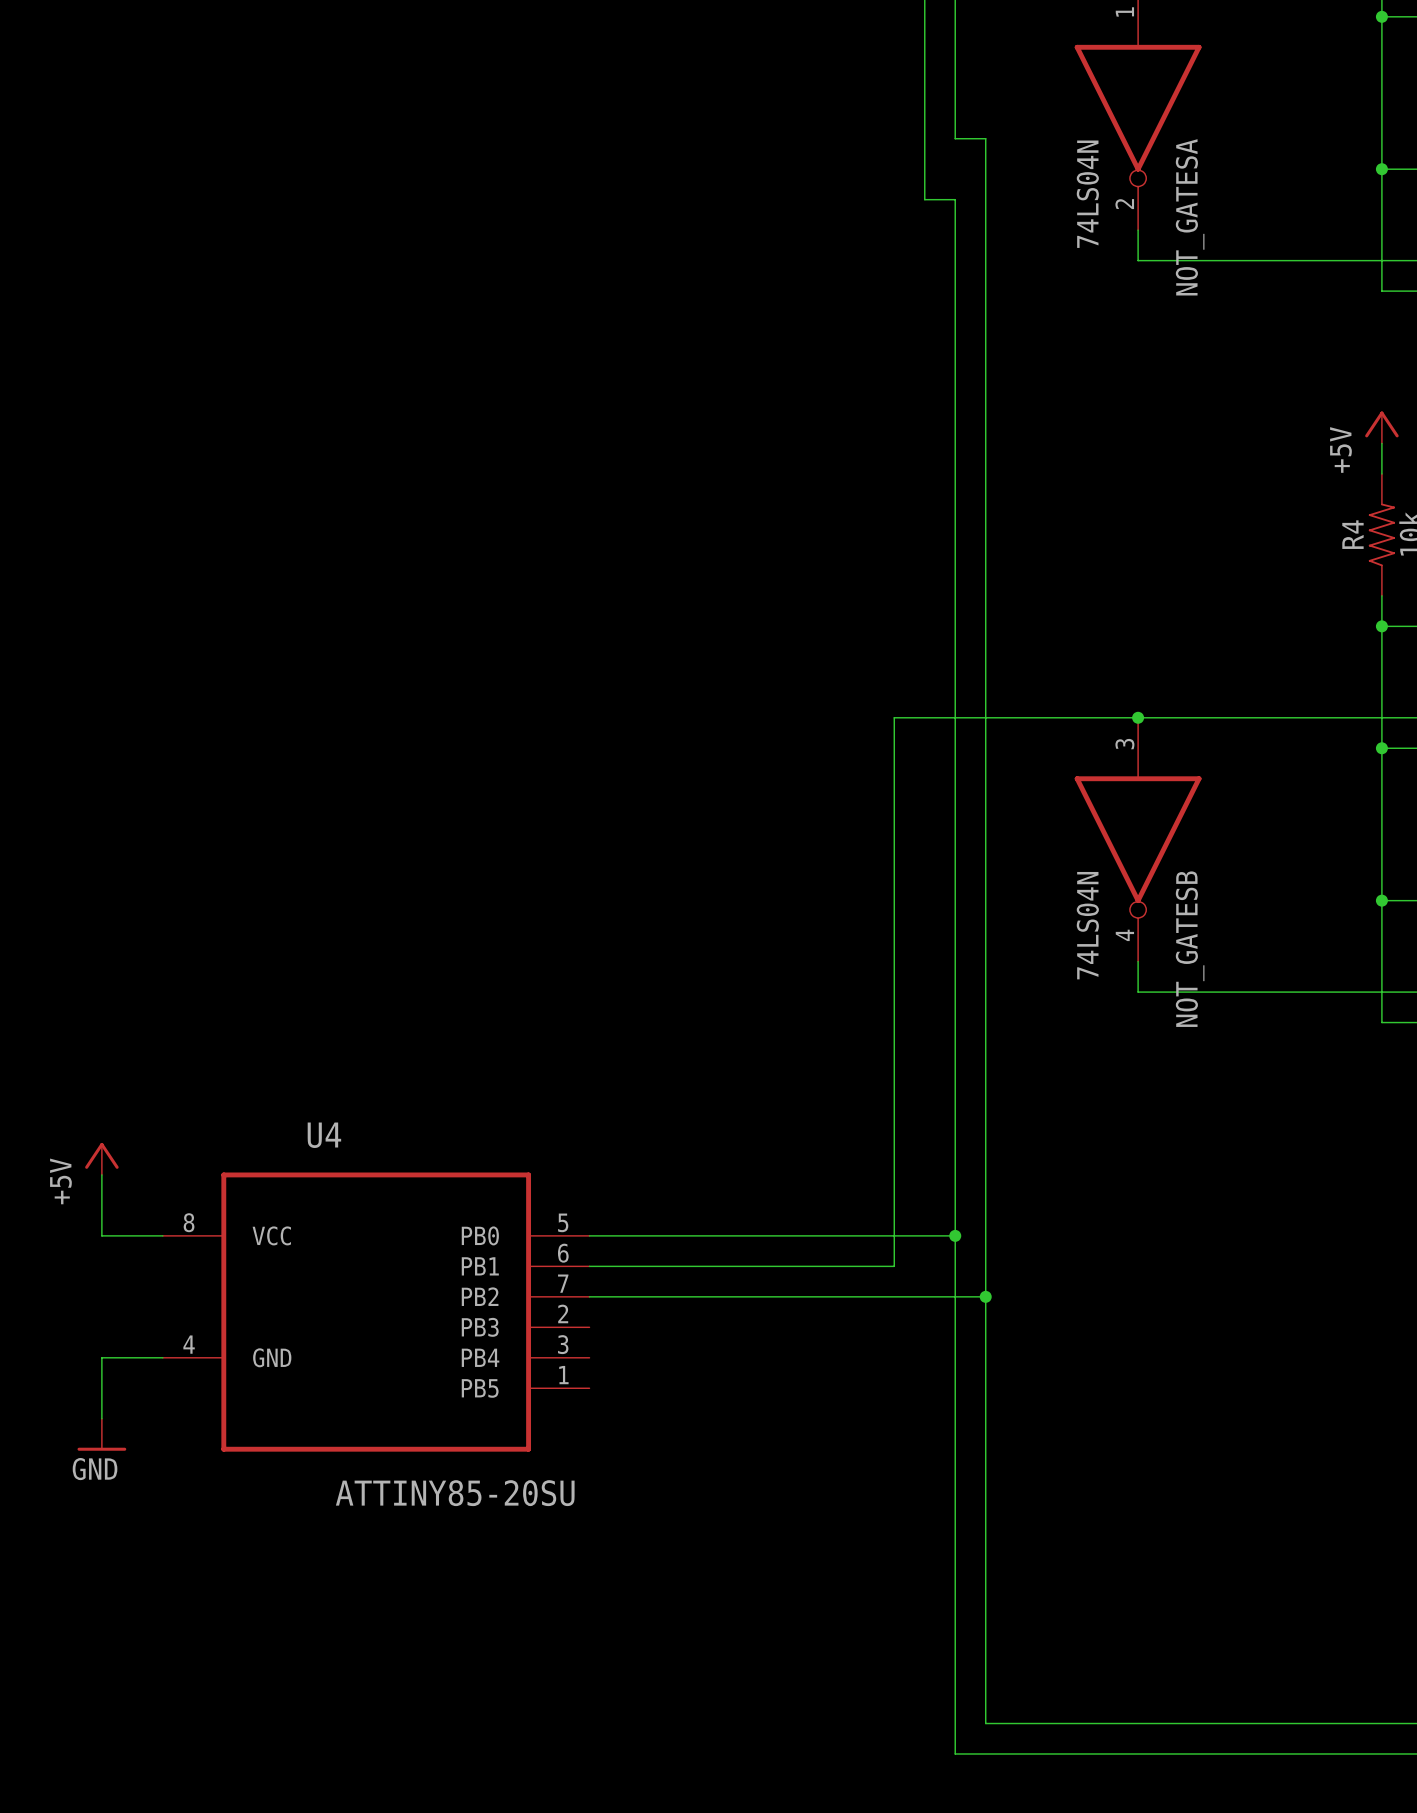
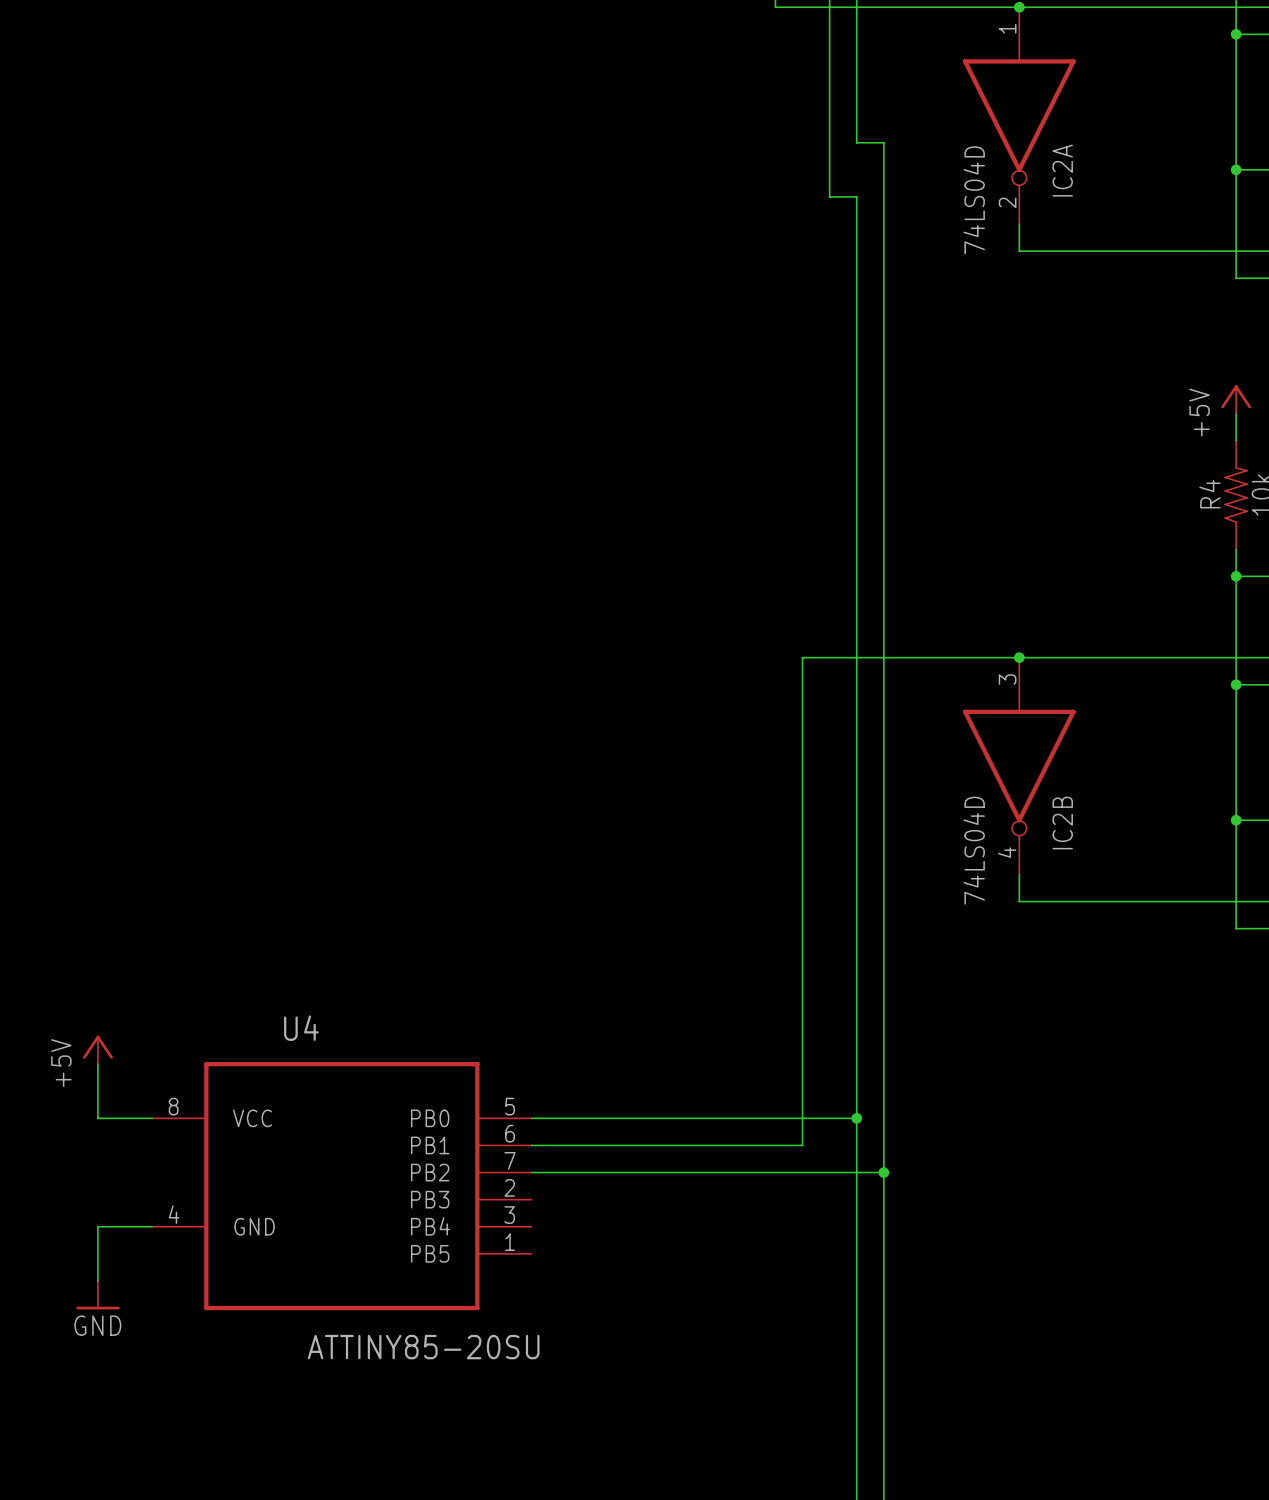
NOT_GATESA value: 74LS04N (1087, 194) -> 74LS04D (974, 200)
NOT_GATESA name: NOT_GATESA (1190, 217) -> IC2A (1062, 170)
NOT_GATESB value: 74LS04N (1087, 925) -> 74LS04D (974, 850)
NOT_GATESB name: NOT_GATESB (1190, 949) -> IC2B (1062, 823)

